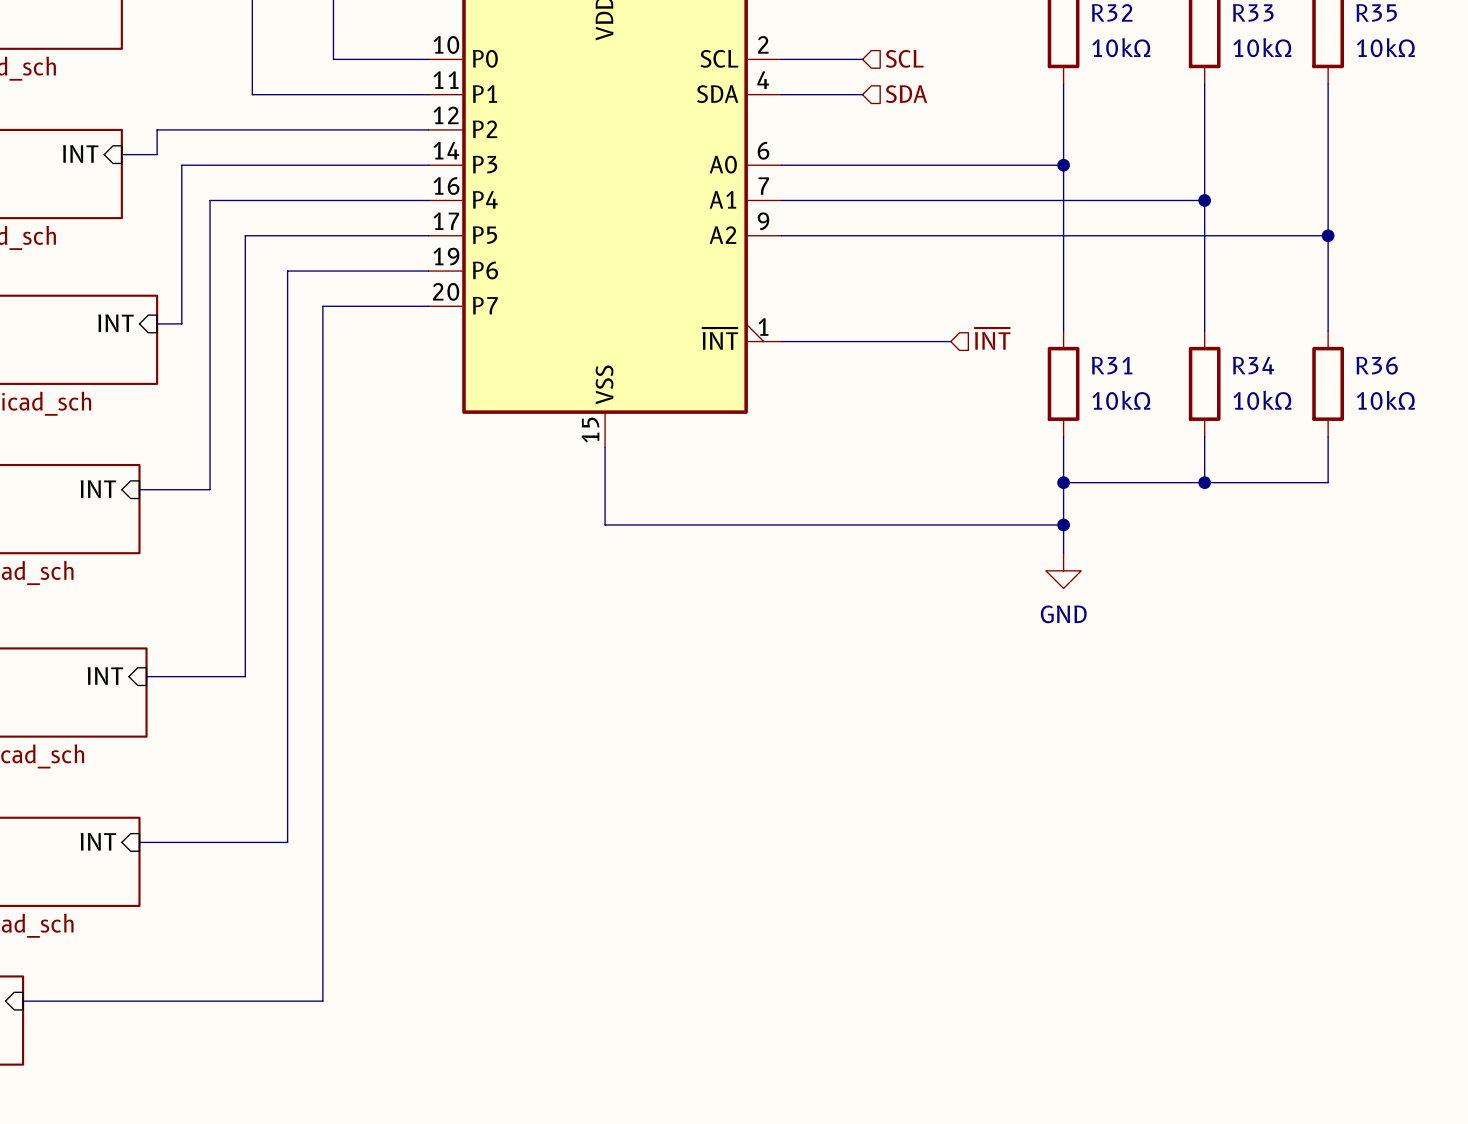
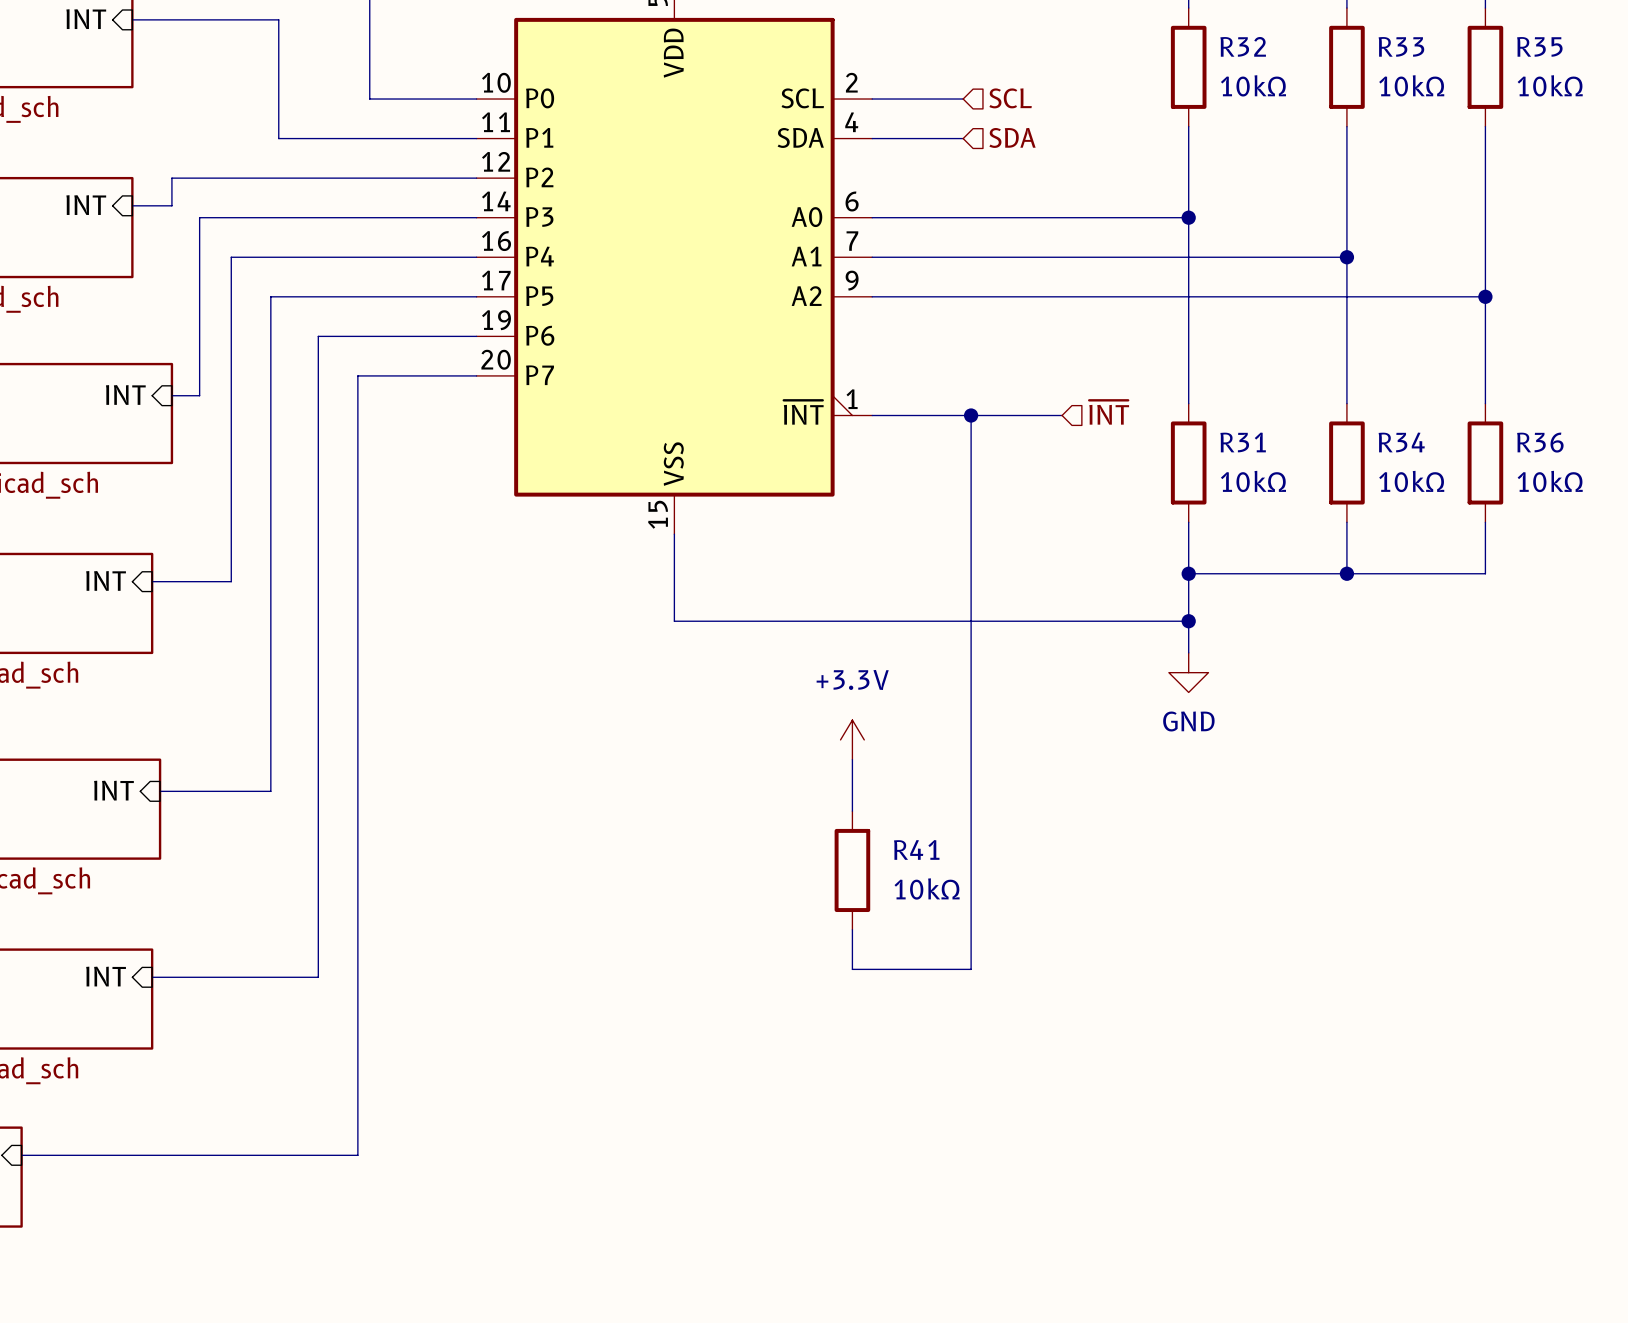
wire: none -> (971, 415) (971, 969) (852, 969) (852, 929)
junction: none -> (971, 415)
power symbol: none -> +3.3V (852, 739)
wire: none -> (852, 759) (852, 811)
R41: none -> 10kΩ (852, 870)

